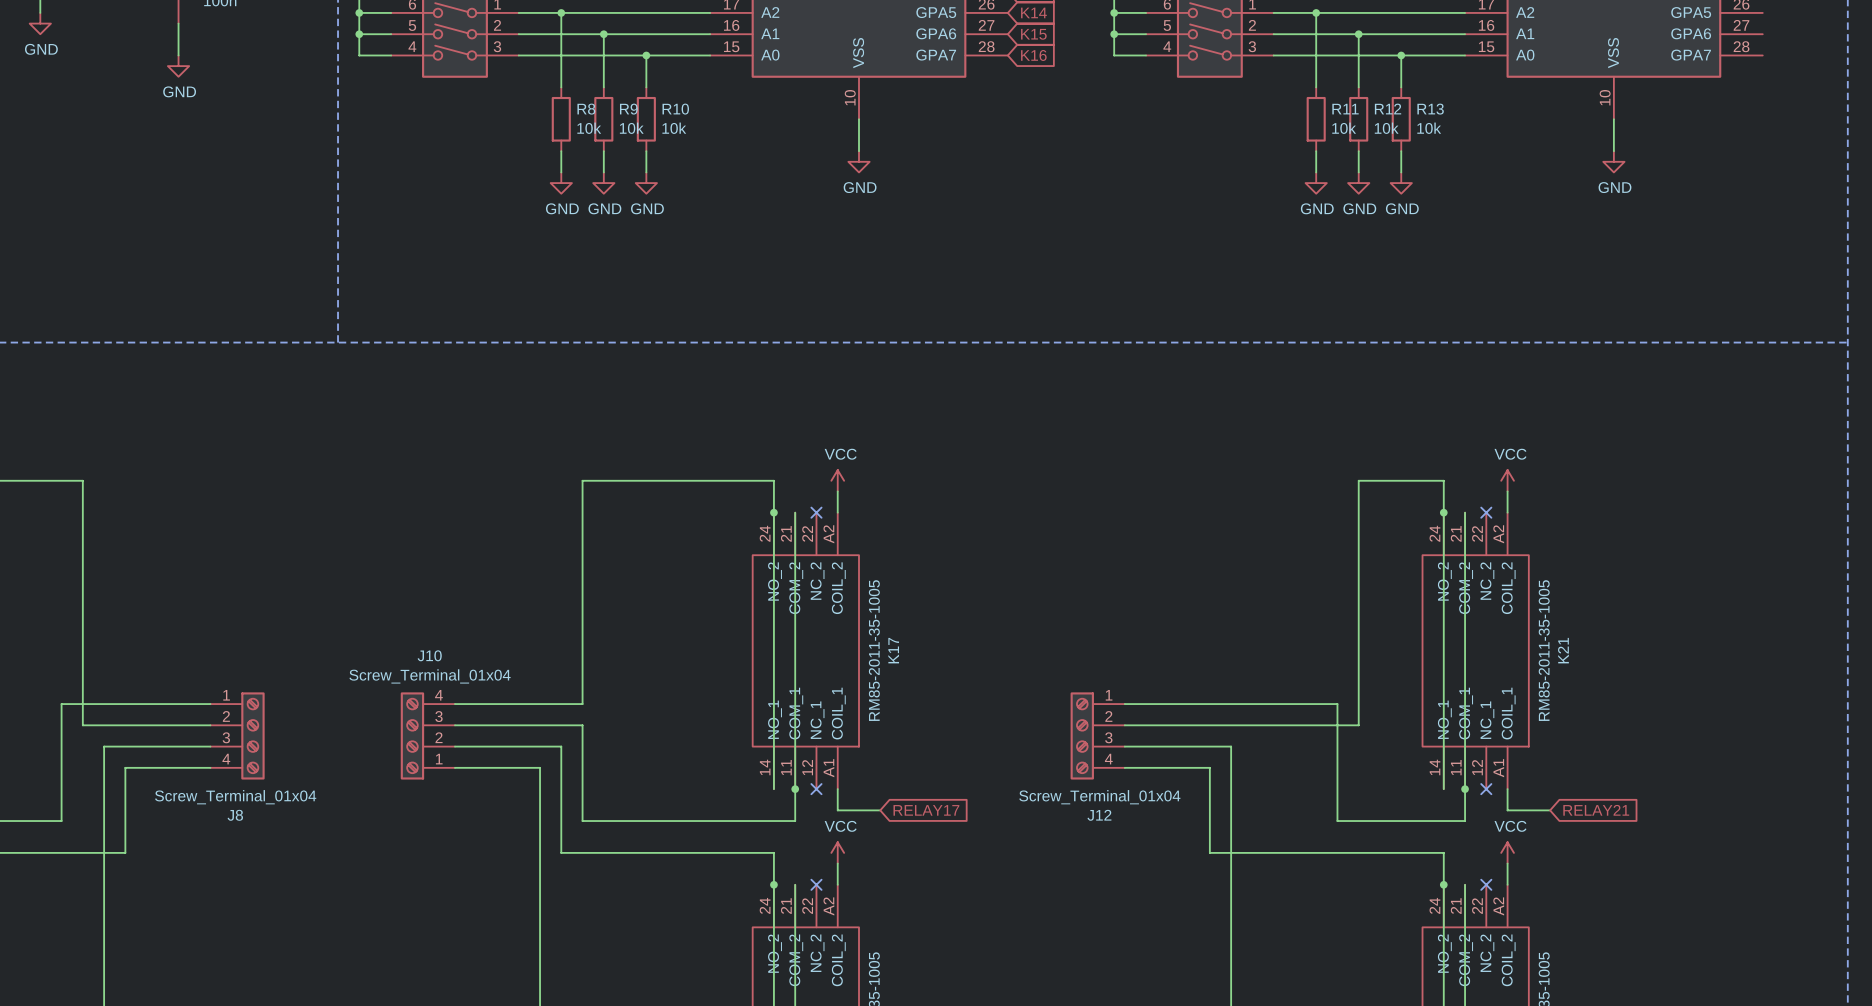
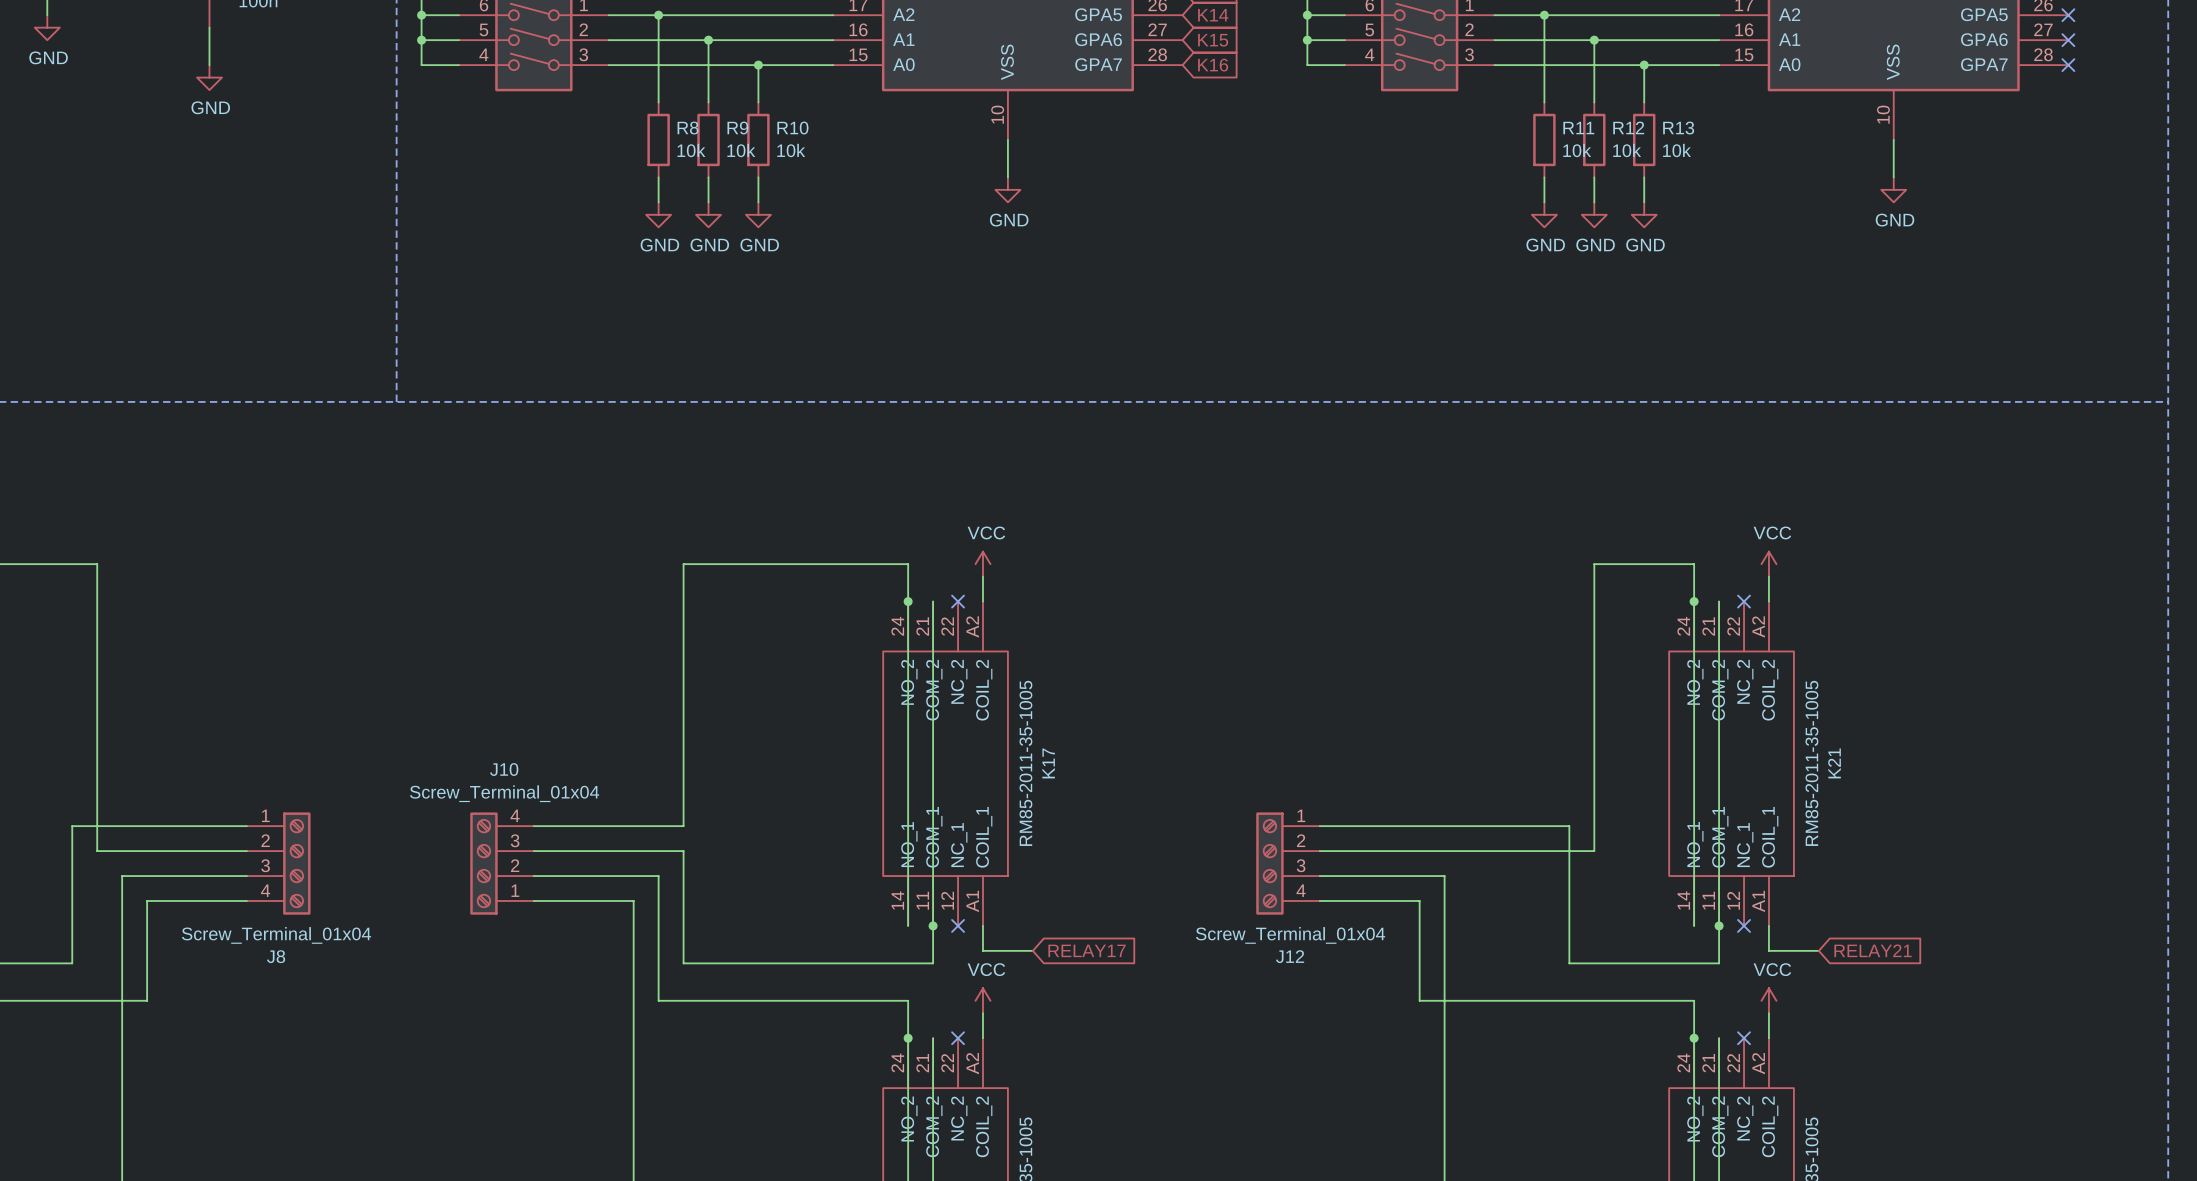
no-connect mark: none -> (2068, 15)
no-connect mark: none -> (2068, 40)
no-connect mark: none -> (2068, 65)

